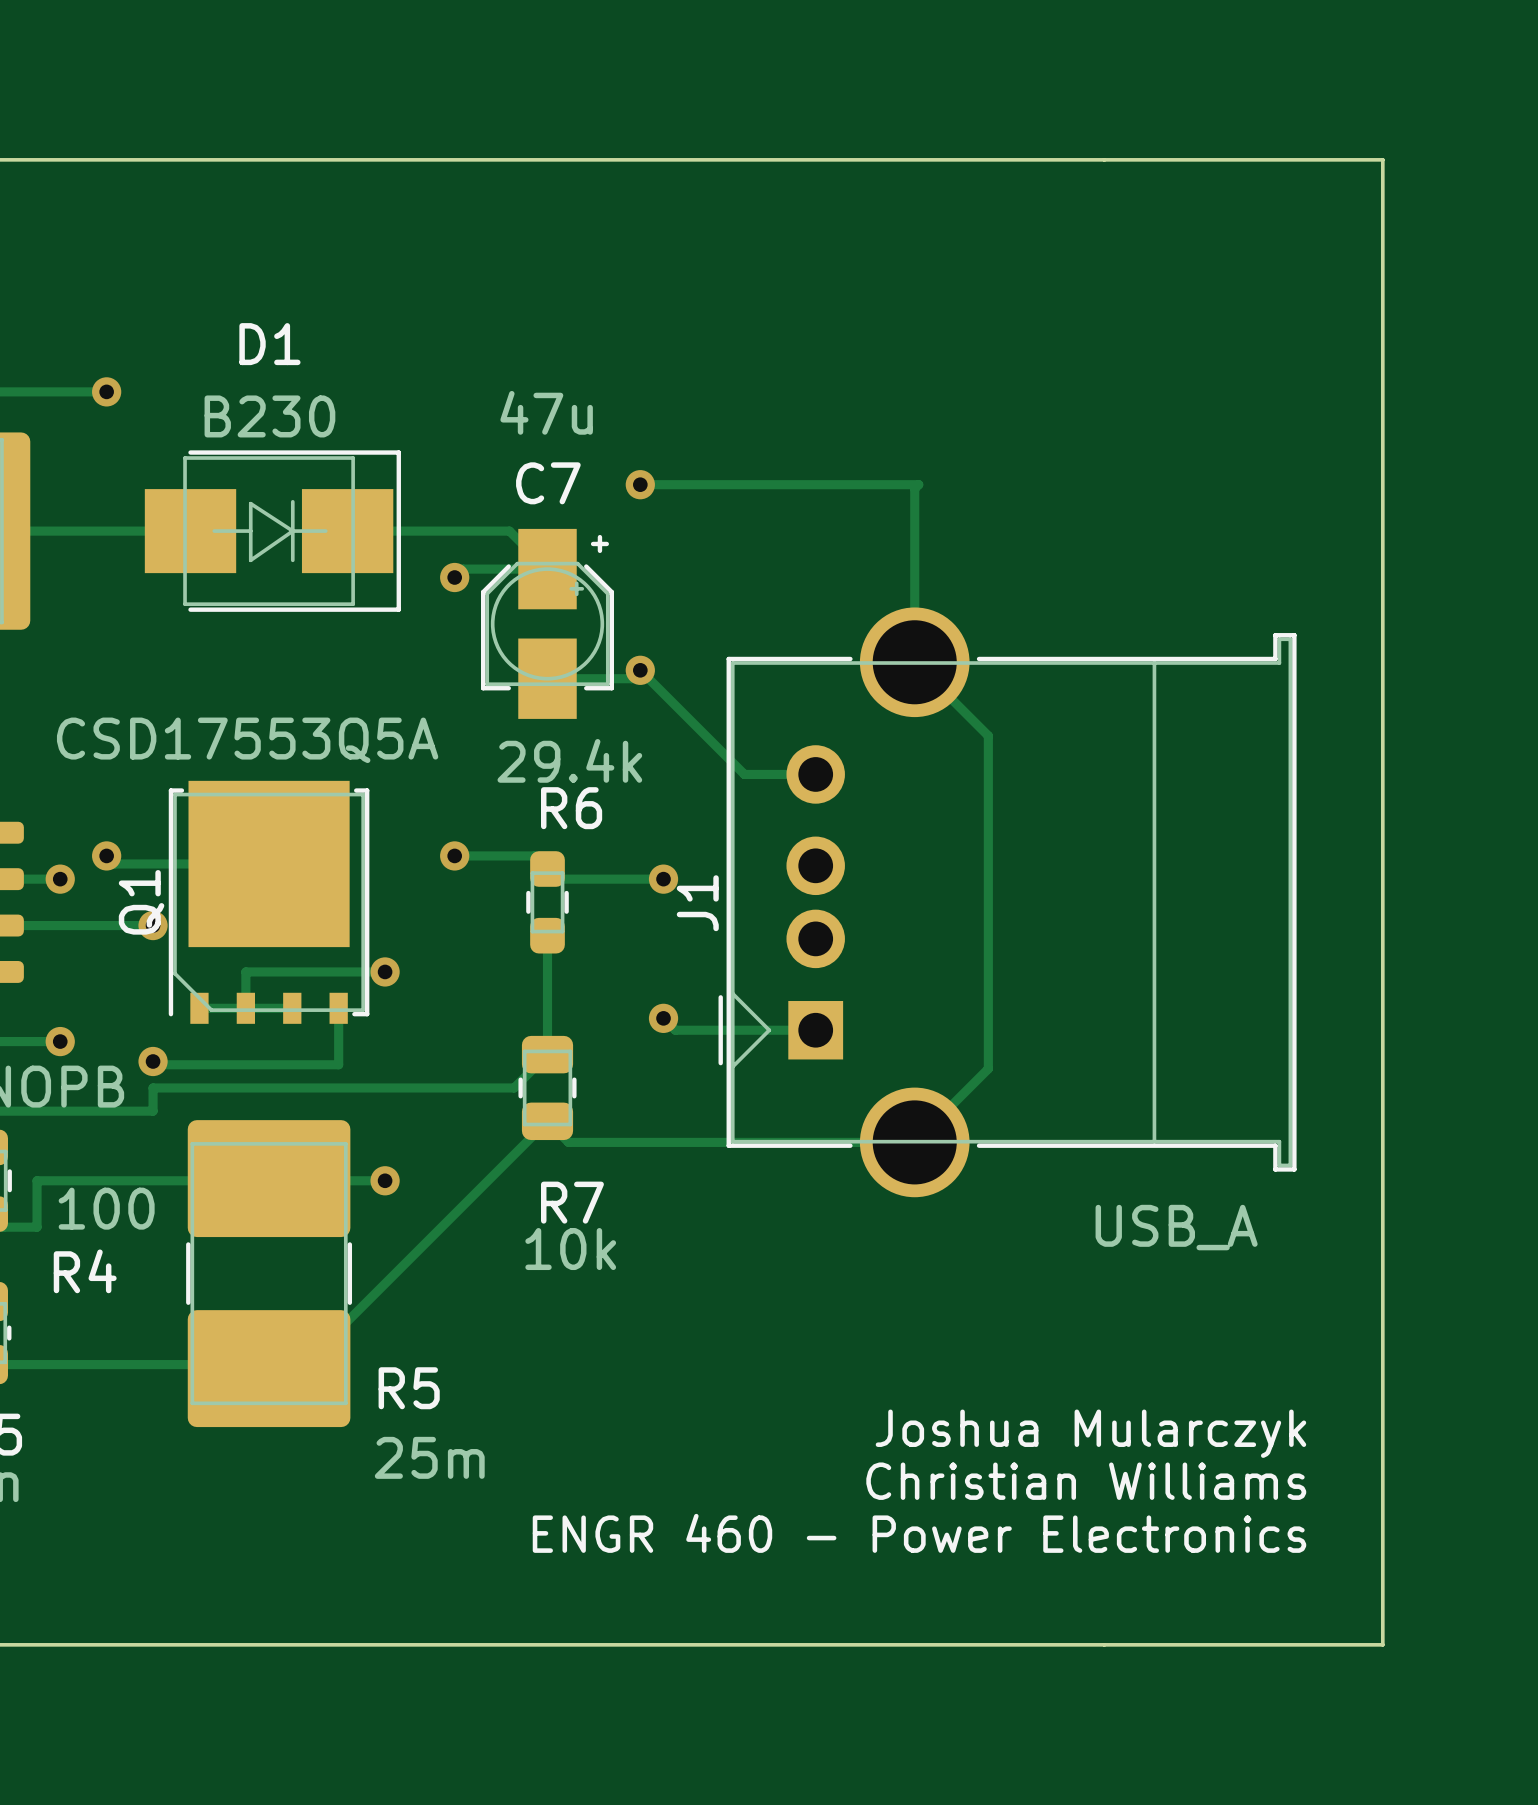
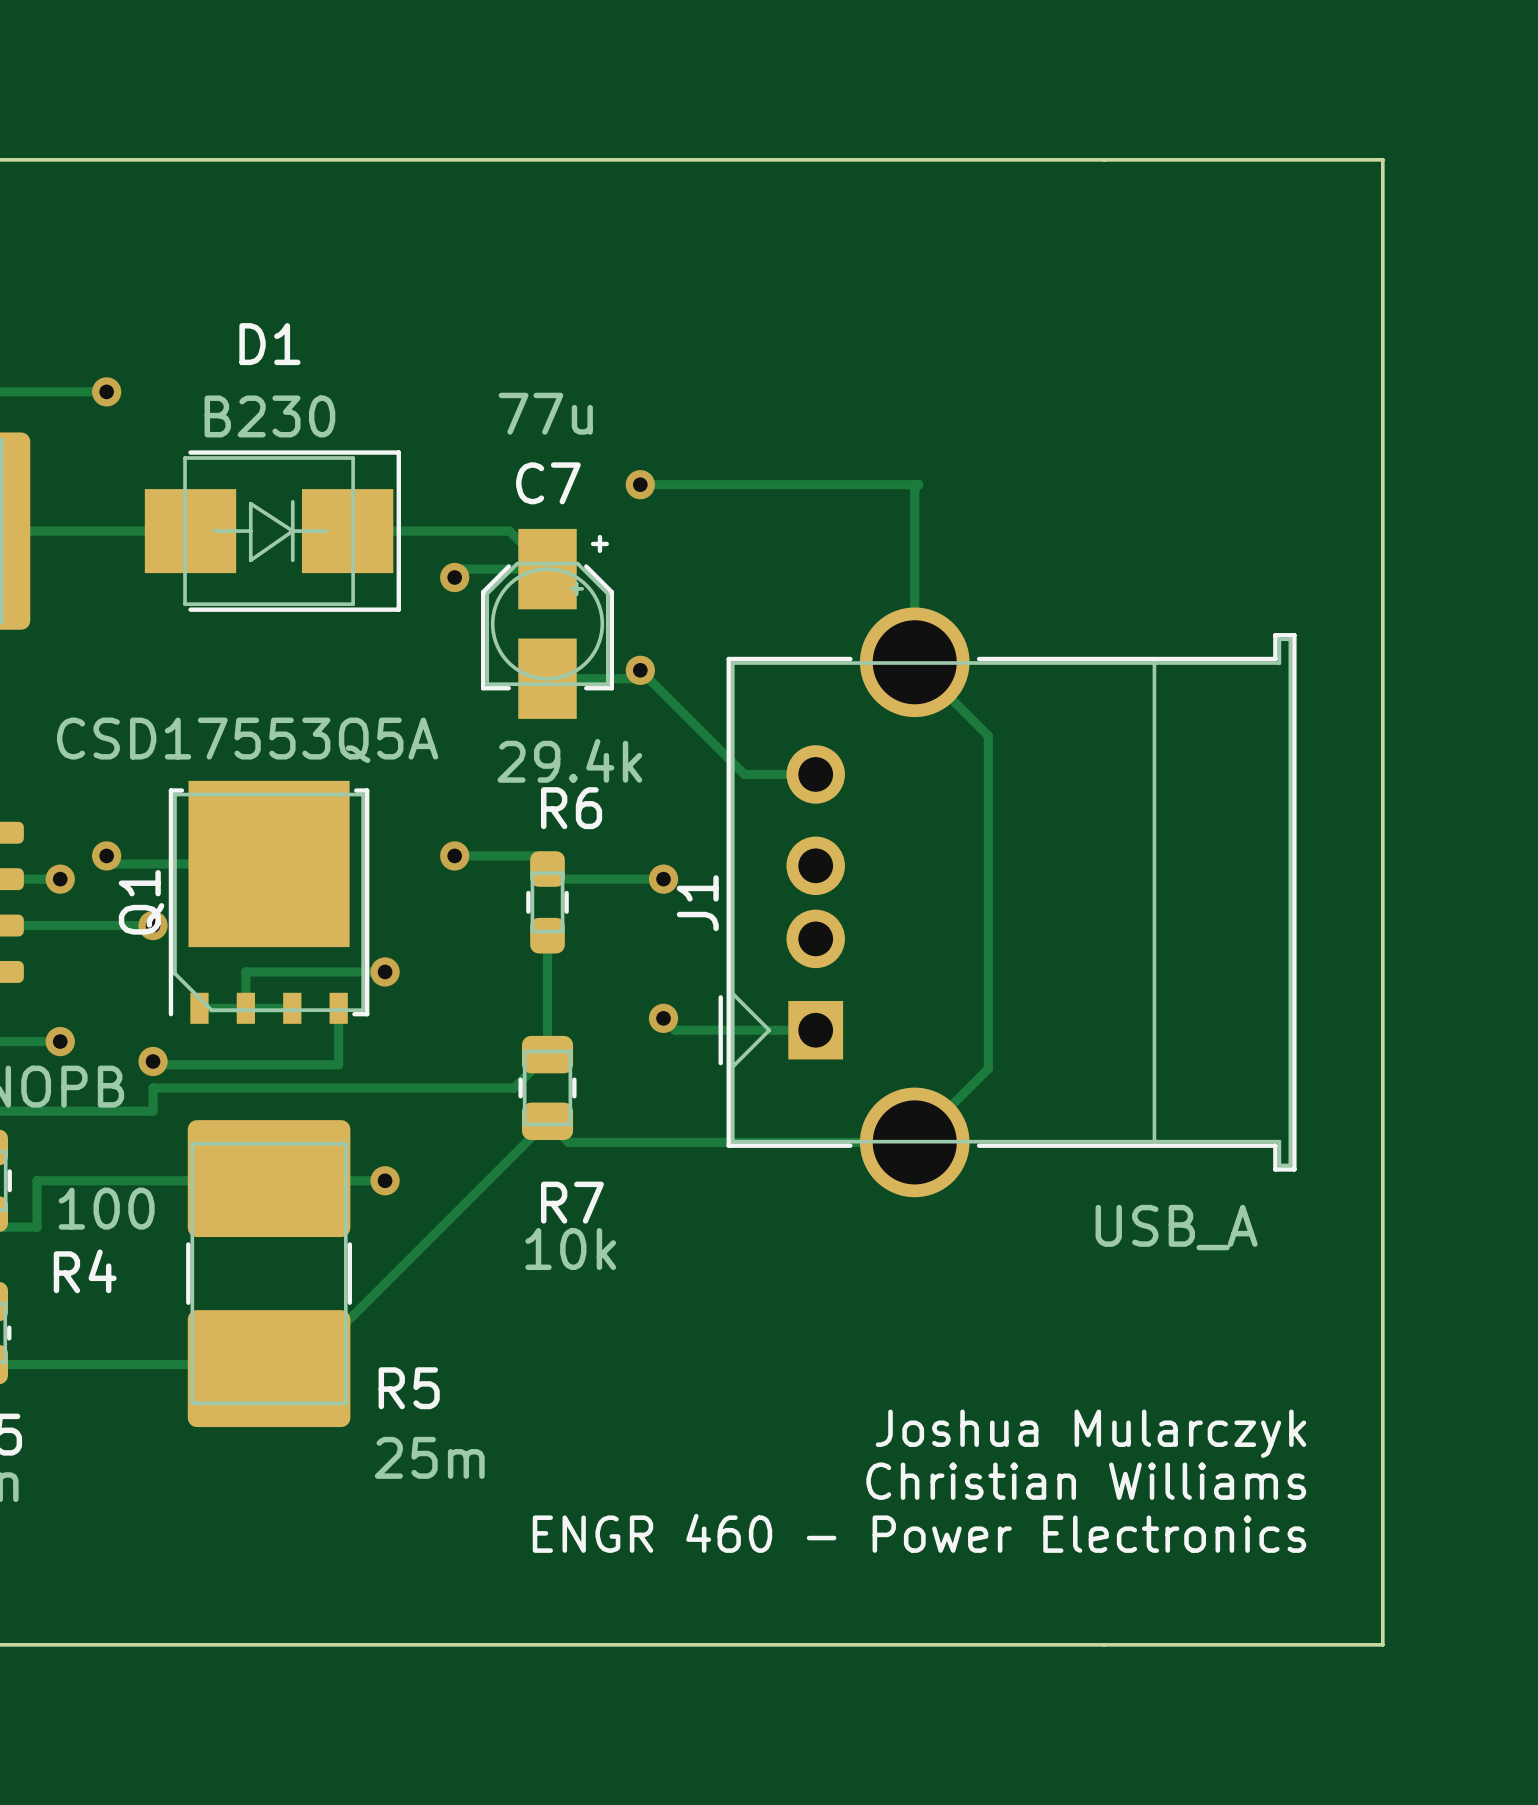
C7 value: 47u (546, 412) -> 77u (545, 413)

